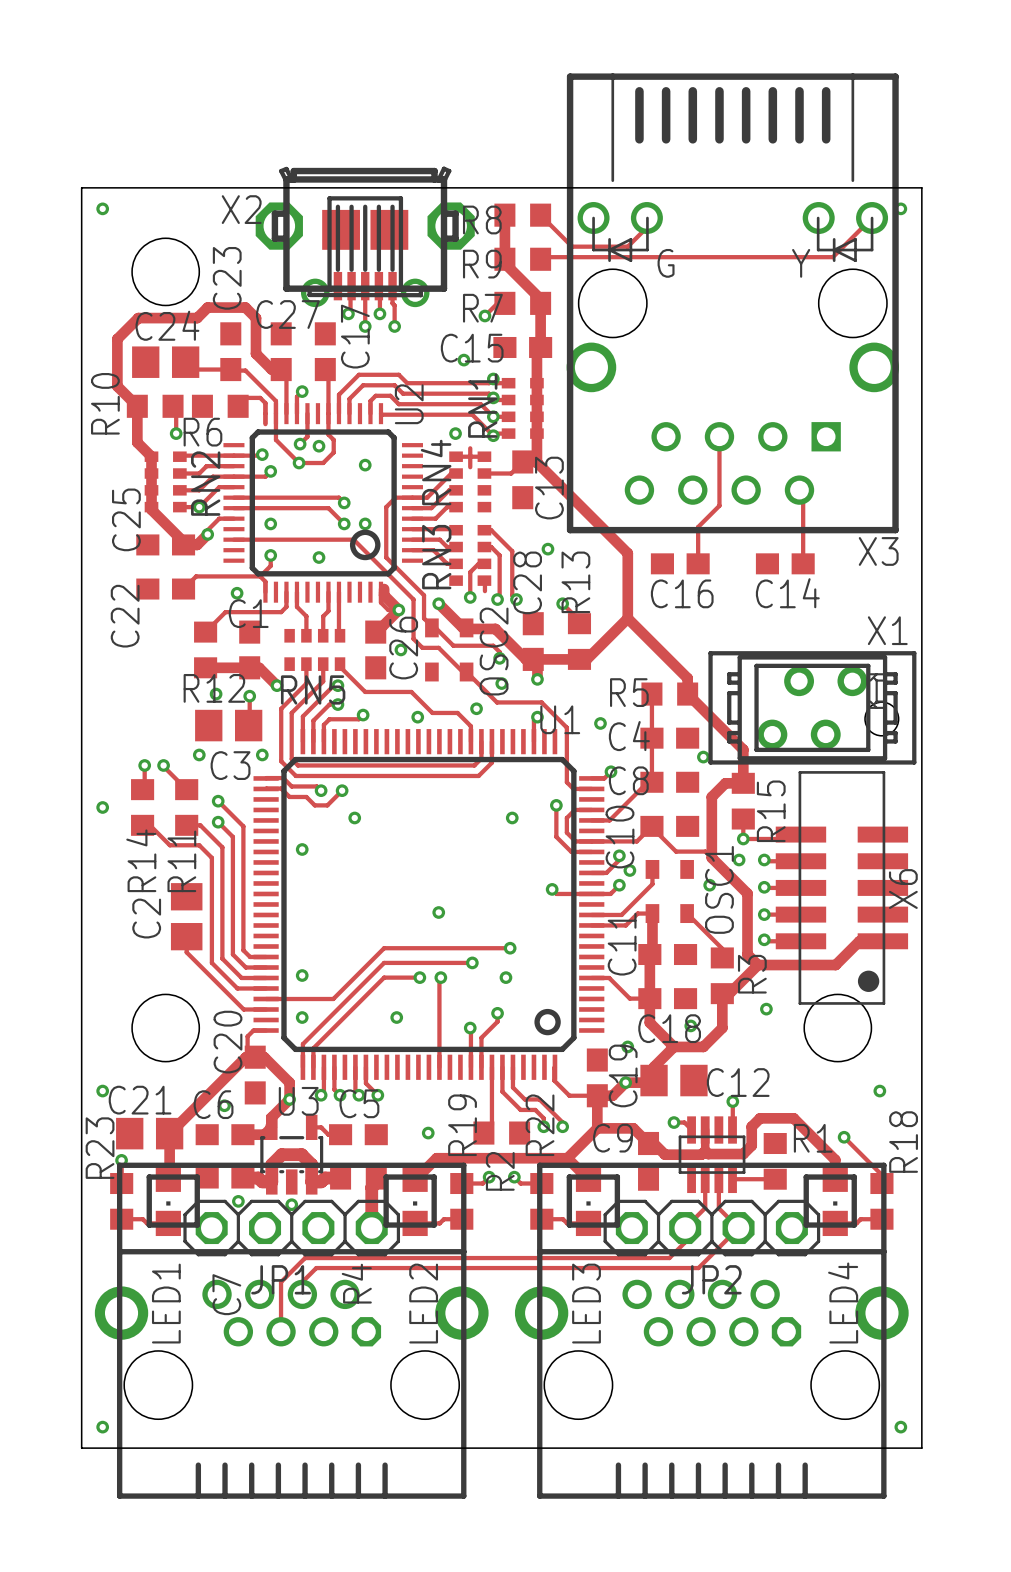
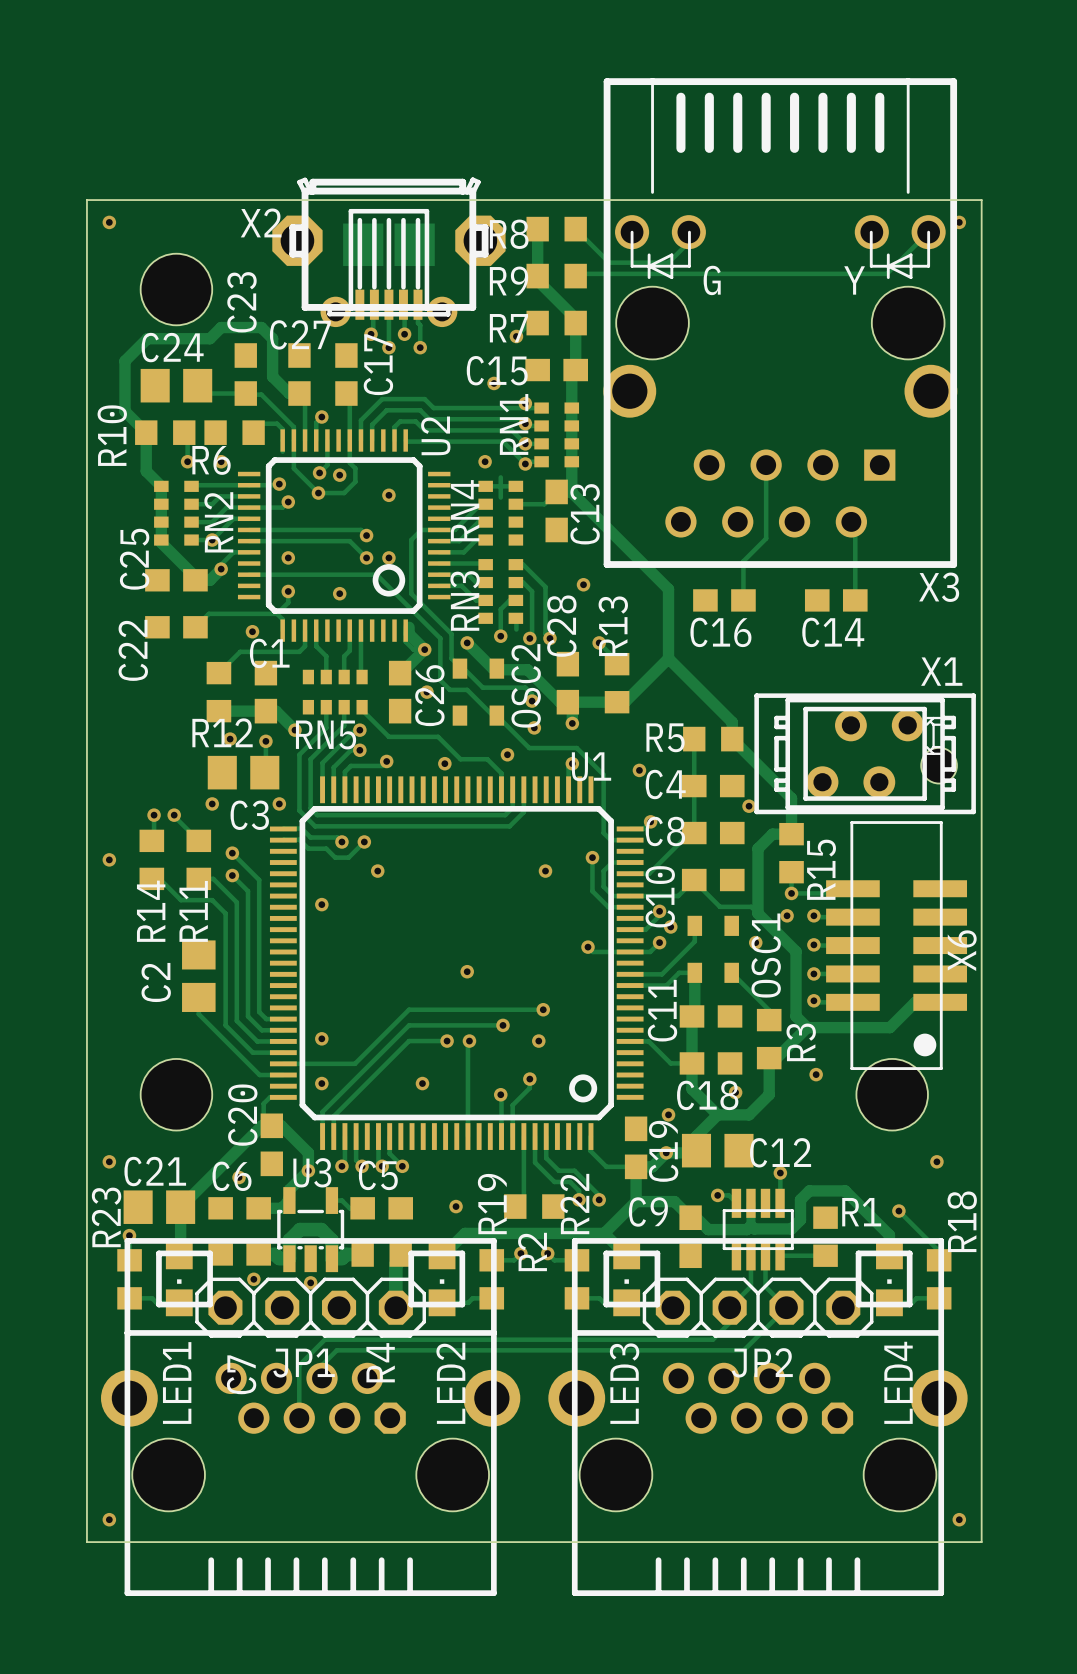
via: none -> (221, 461)

